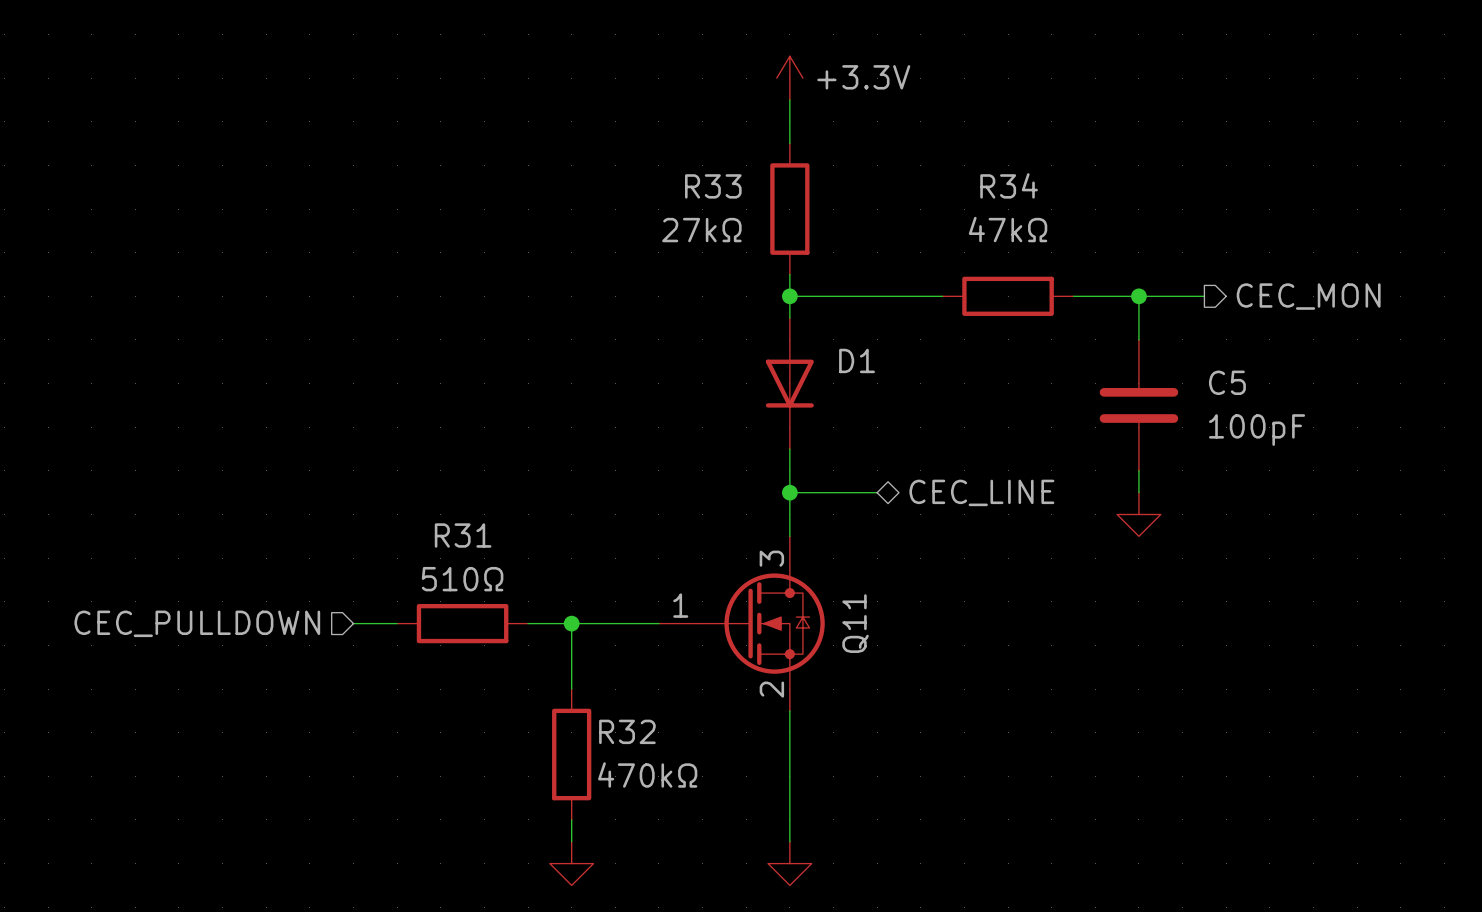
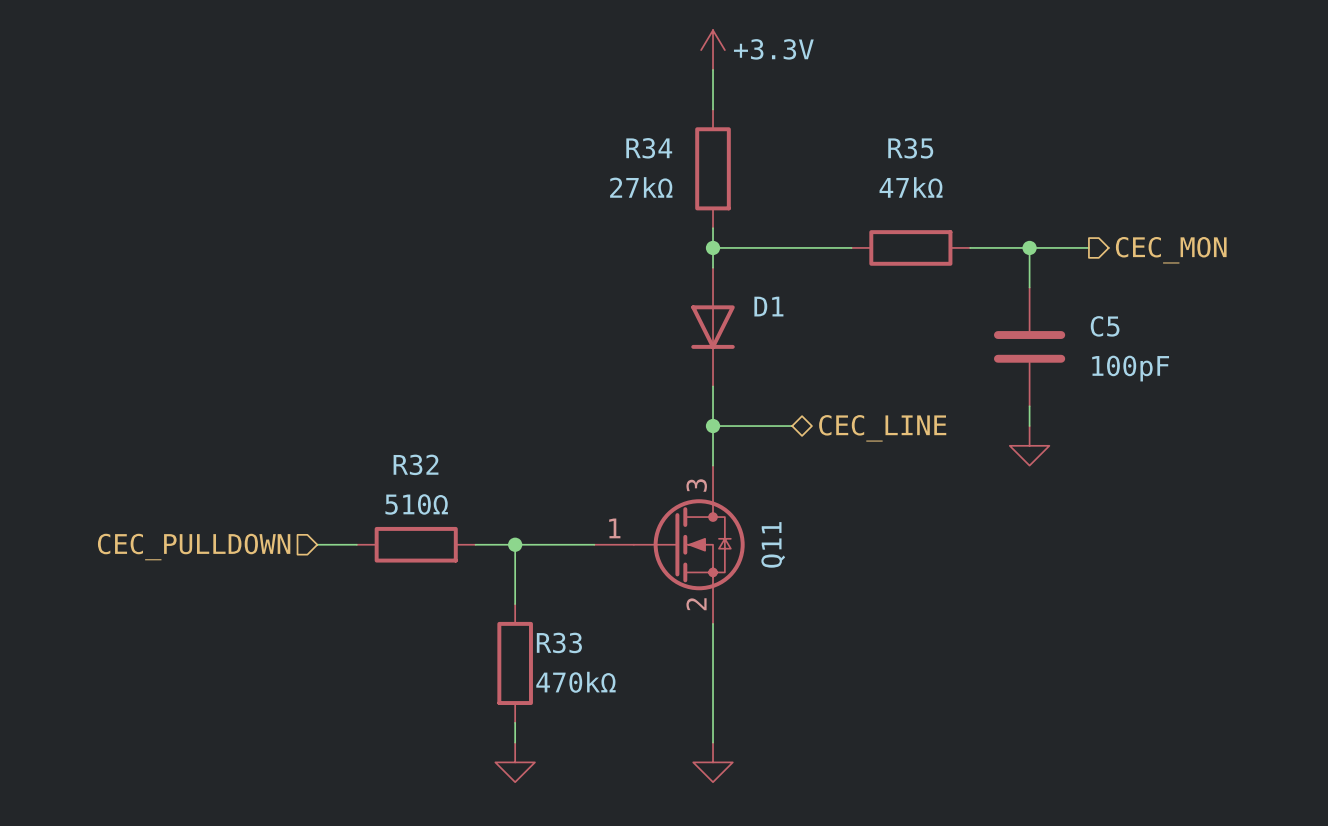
R34 name: R34 (1009, 185) -> R35 (910, 148)
R33 name: R33 (713, 186) -> R34 (649, 148)
R31 name: R31 (463, 535) -> R32 (416, 464)
R32 name: R32 (627, 731) -> R33 (559, 642)

